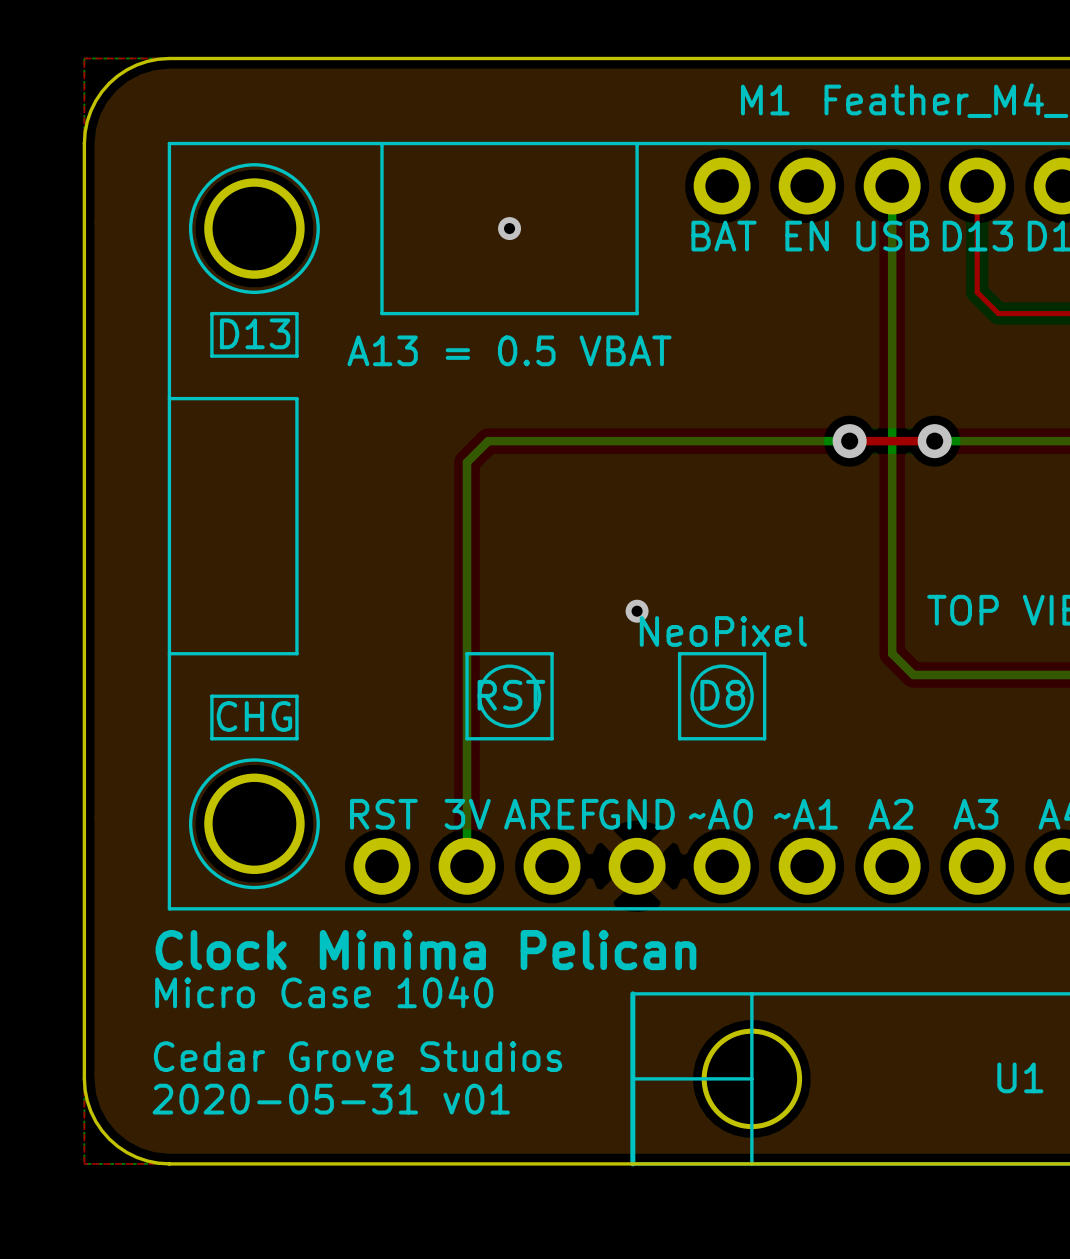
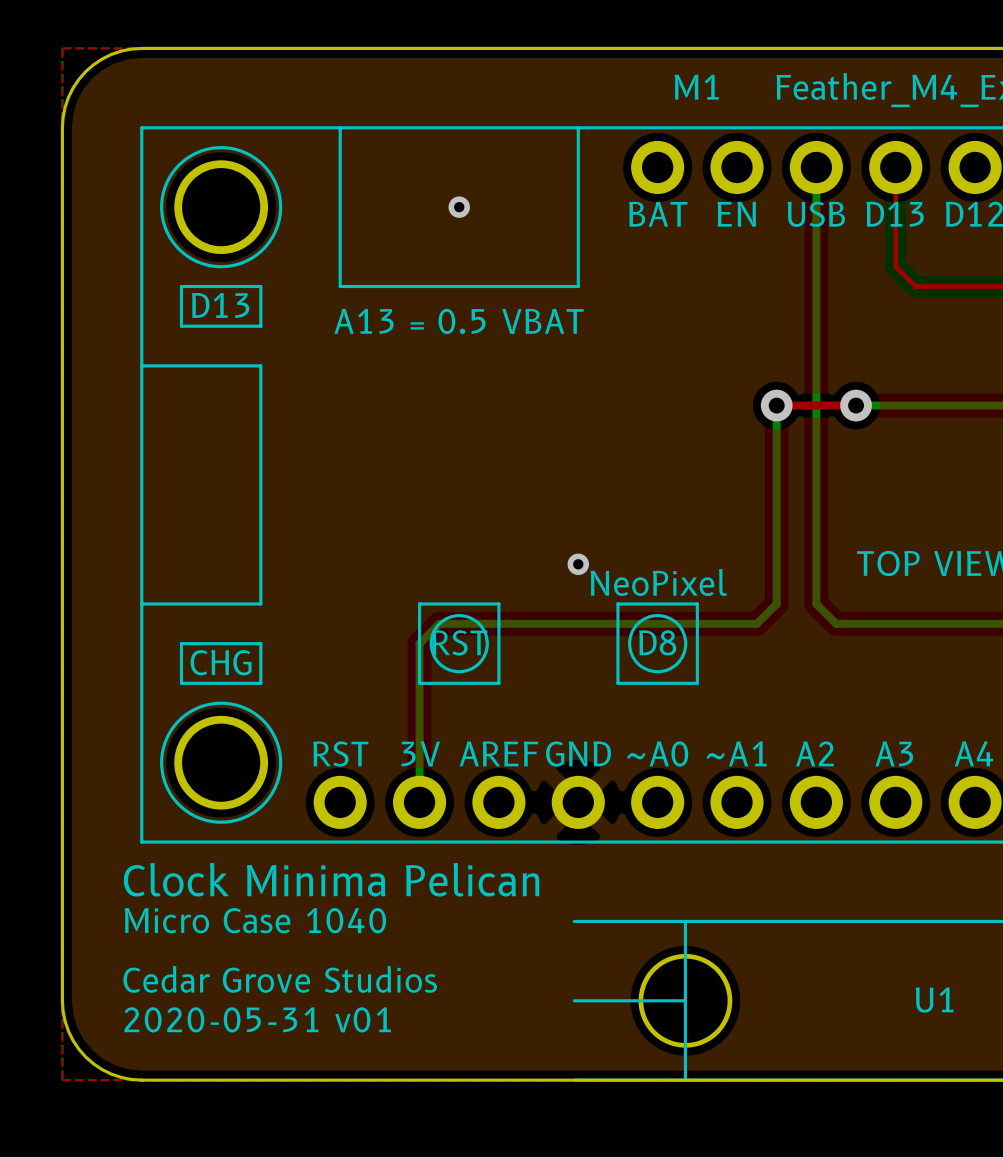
bottom track: (849, 441) (488, 441) (467, 462) (467, 696) -> (776, 405) (776, 603) (756, 623) (439, 623) (419, 643)
line: (632, 993) (632, 1163) -> none

